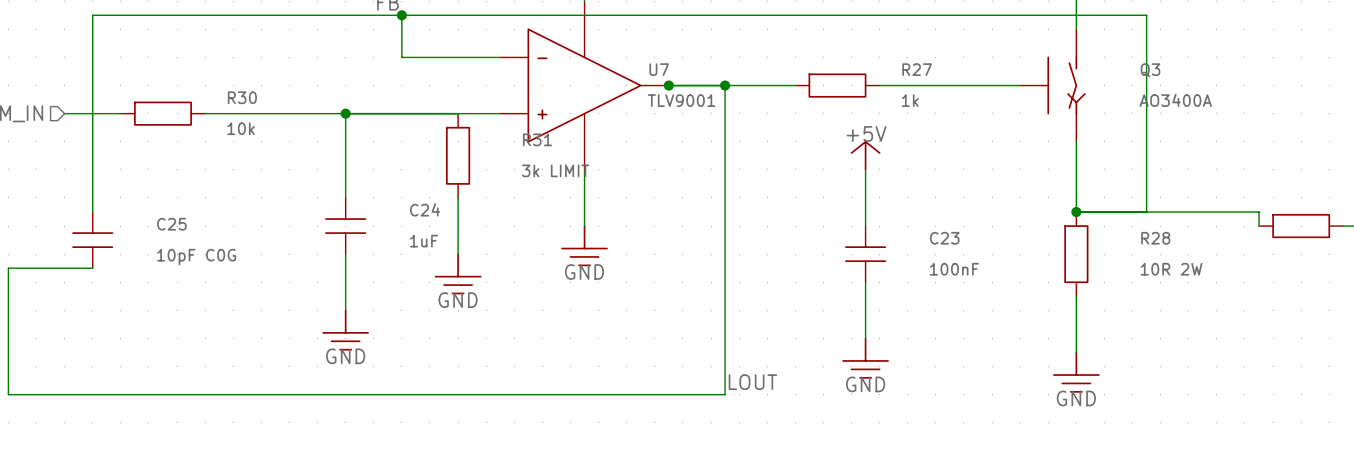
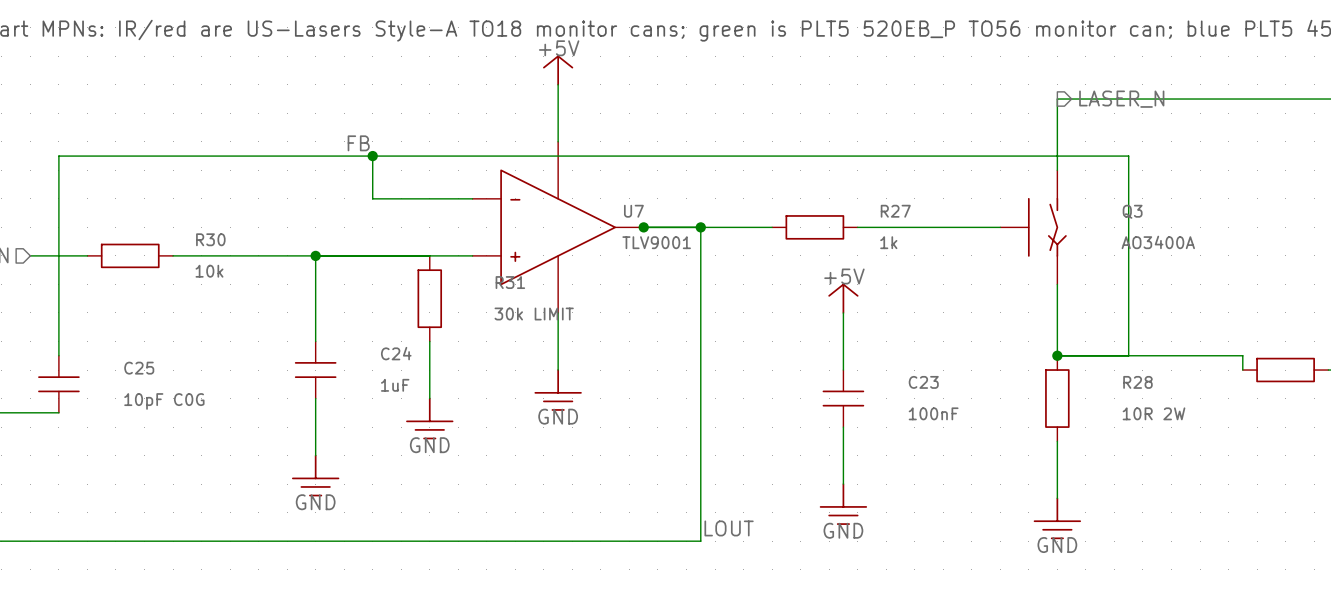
R31 value: 3k LIMIT (555, 170) -> 30k LIMIT (534, 314)

